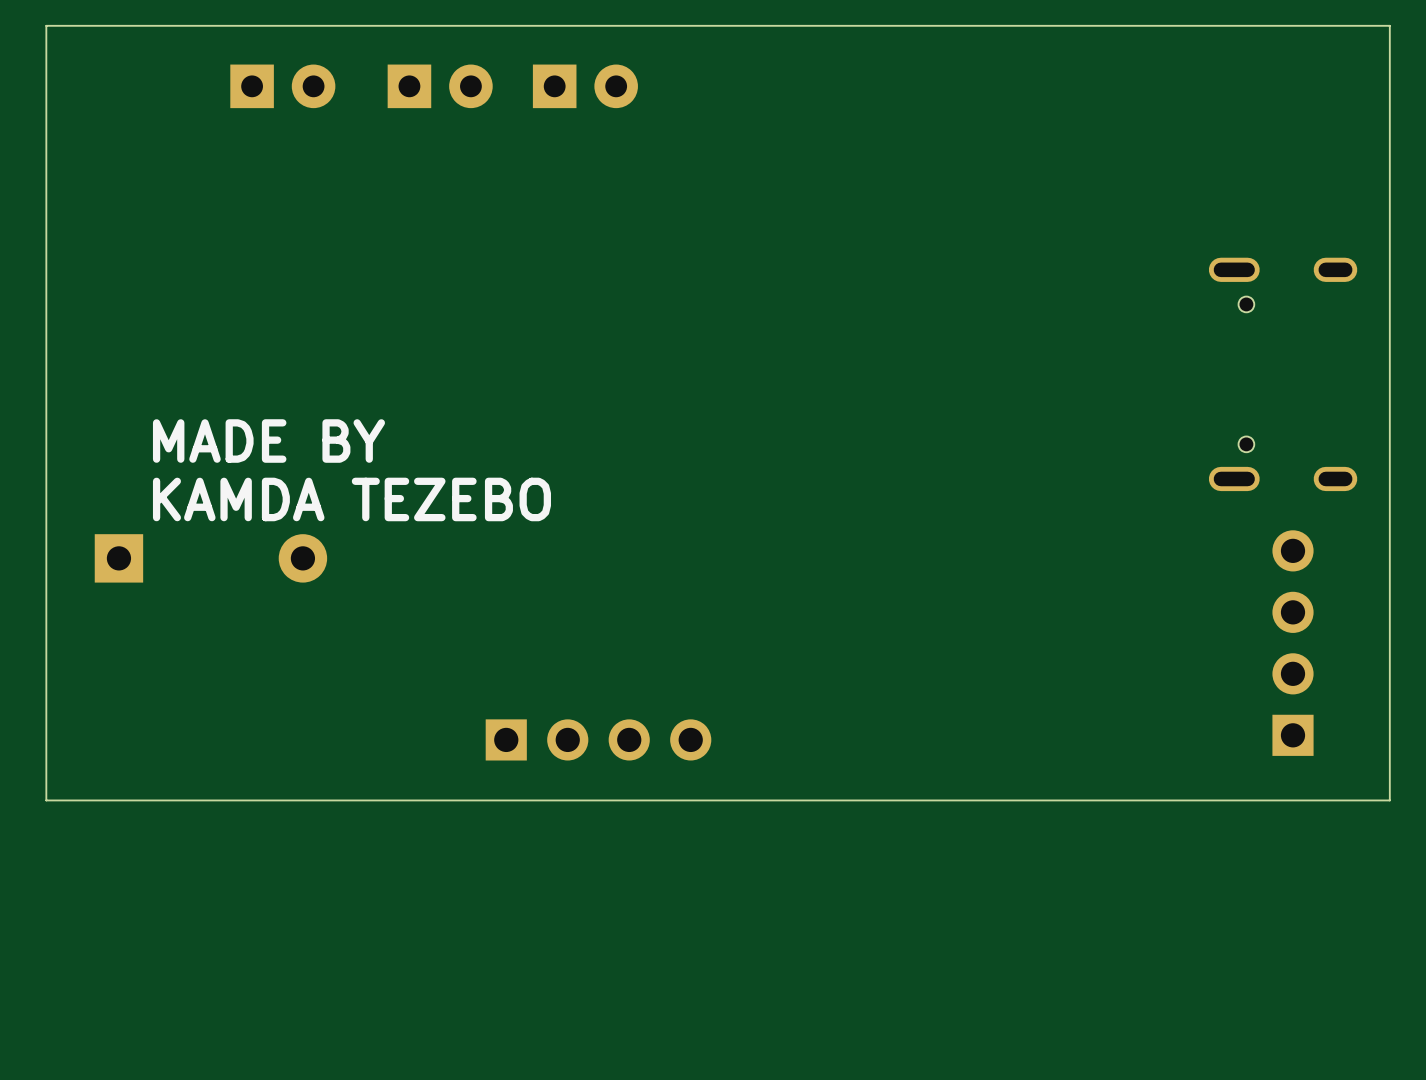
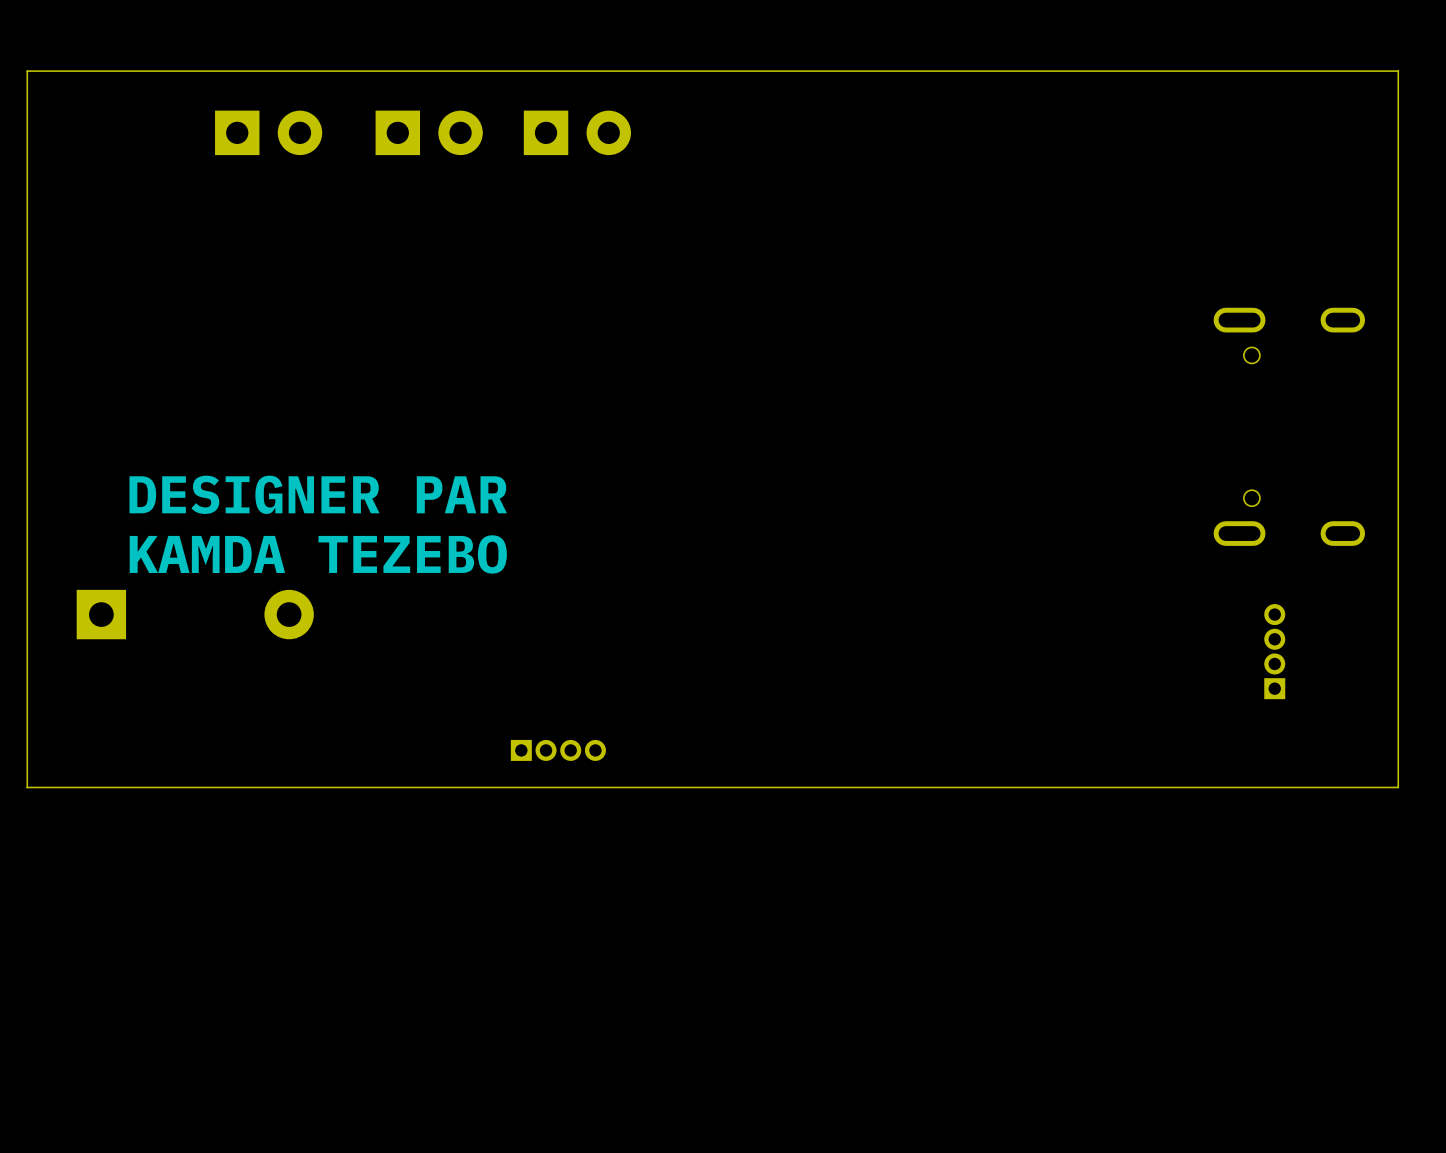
text: MADE BY (268, 441) -> DESIGNER PAR (318, 494)
part: none -> (1274, 651)
part: (1293, 643) -> none
part: none -> (558, 750)
board edge: (1389, 727) (1389, 800) (46, 800) (46, 727) -> (1398, 787) (27, 787)
part: (598, 739) -> none

